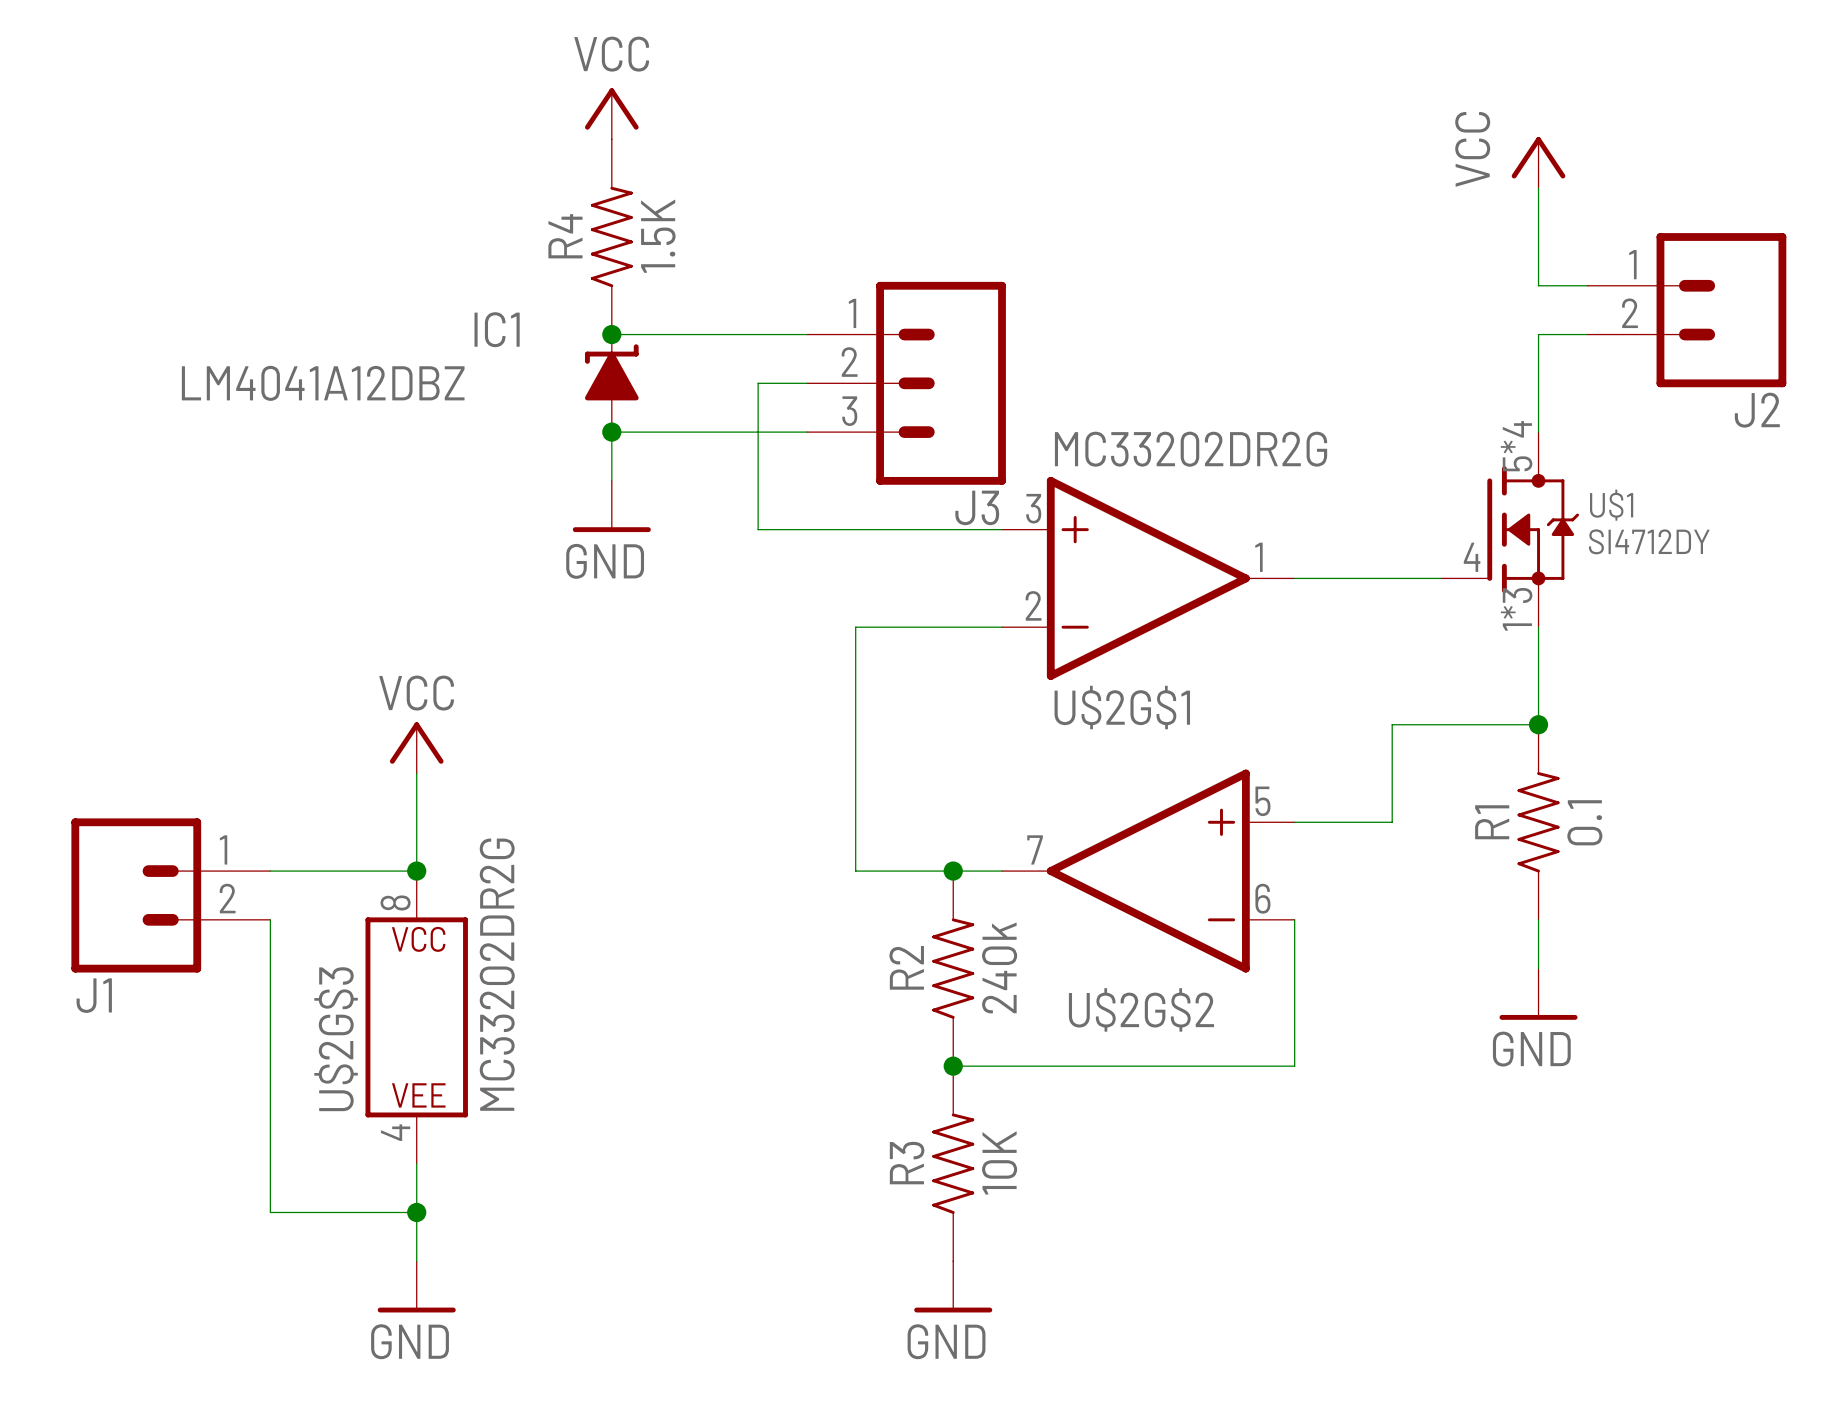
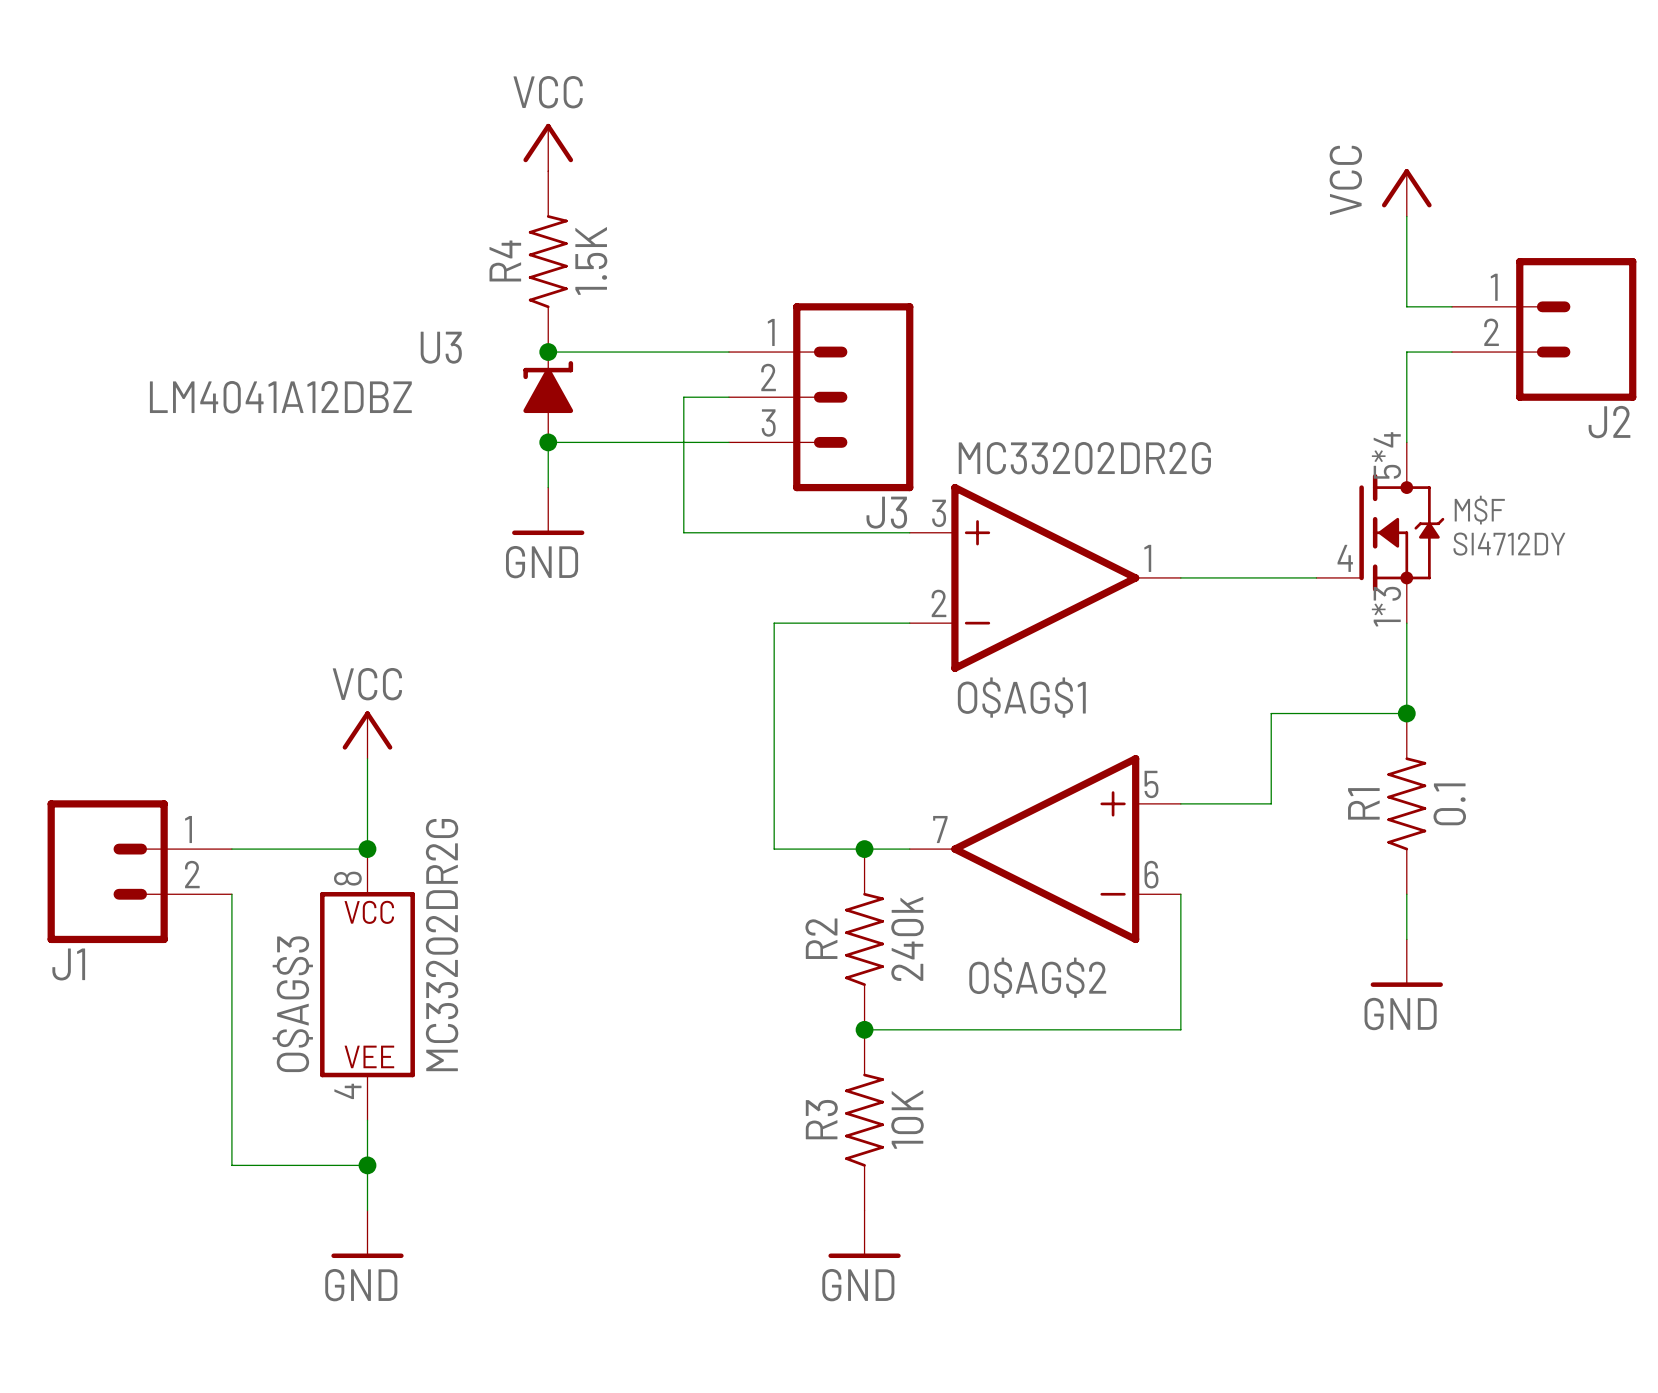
IC1 name: IC1 (497, 329) -> U3 (441, 347)
U$1 name: U$1 (1611, 505) -> M$F (1479, 510)
U$2G$1 name: U$2G$1 (1122, 707) -> O$AG$1 (1021, 697)
U$2G$2 name: U$2G$2 (1141, 1009) -> O$AG$2 (1037, 977)
U$2G$3 name: U$2G$3 (336, 1039) -> O$AG$3 (292, 1004)

